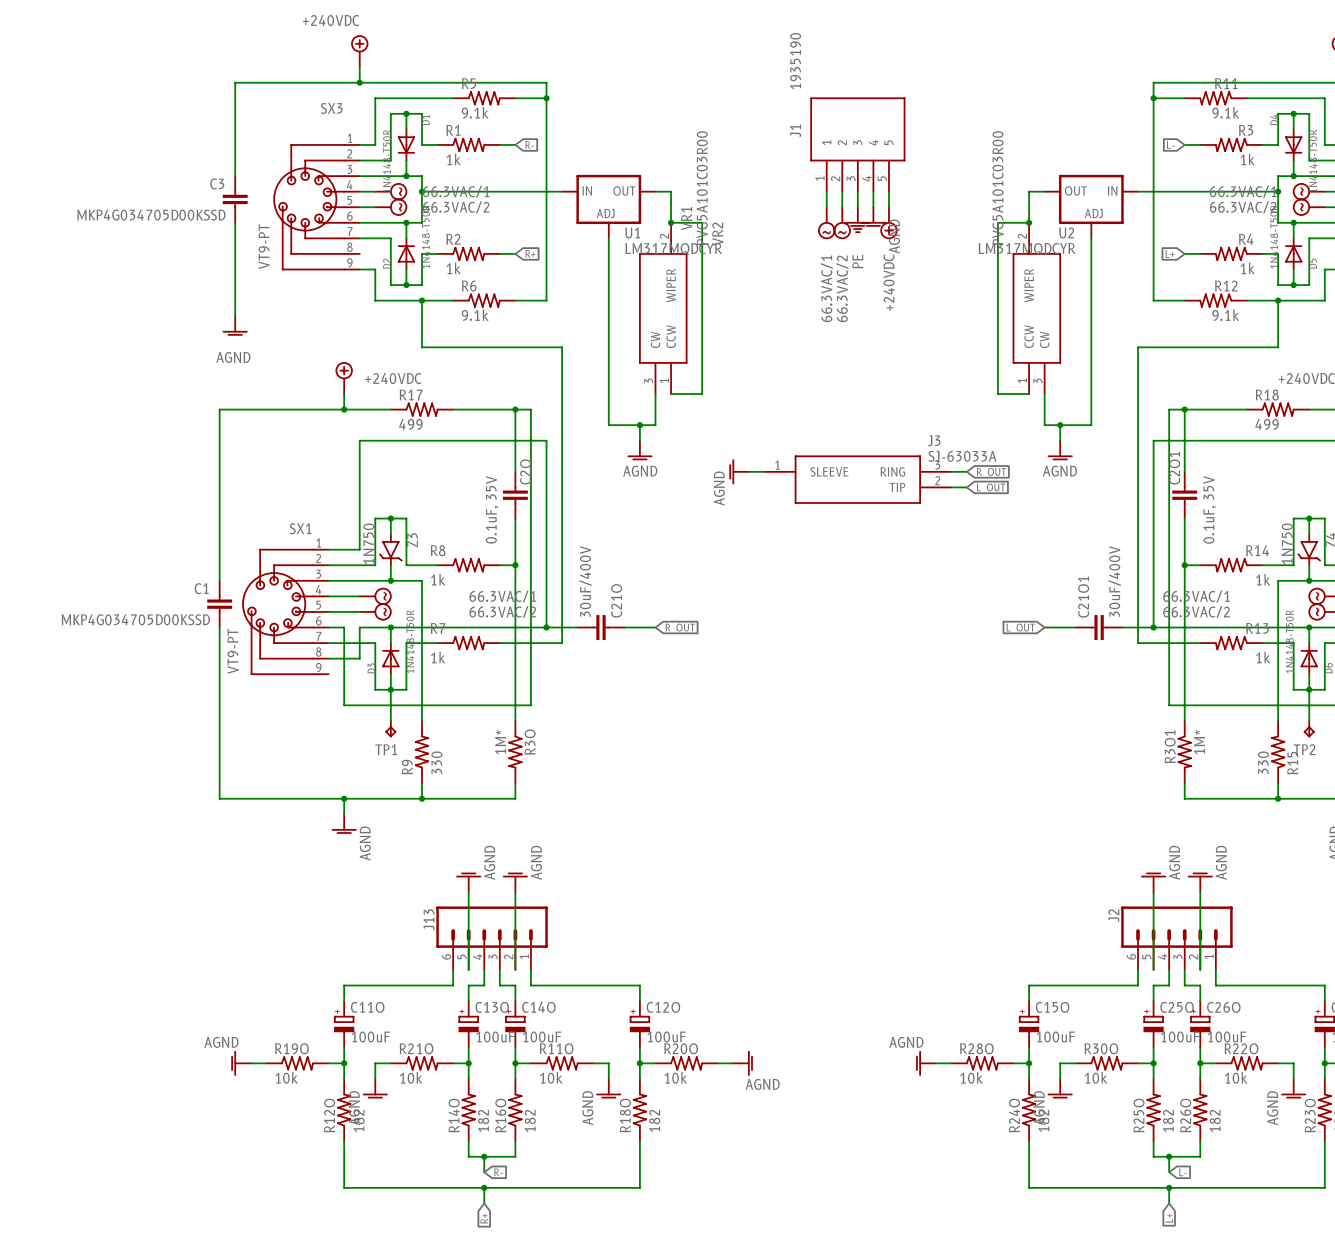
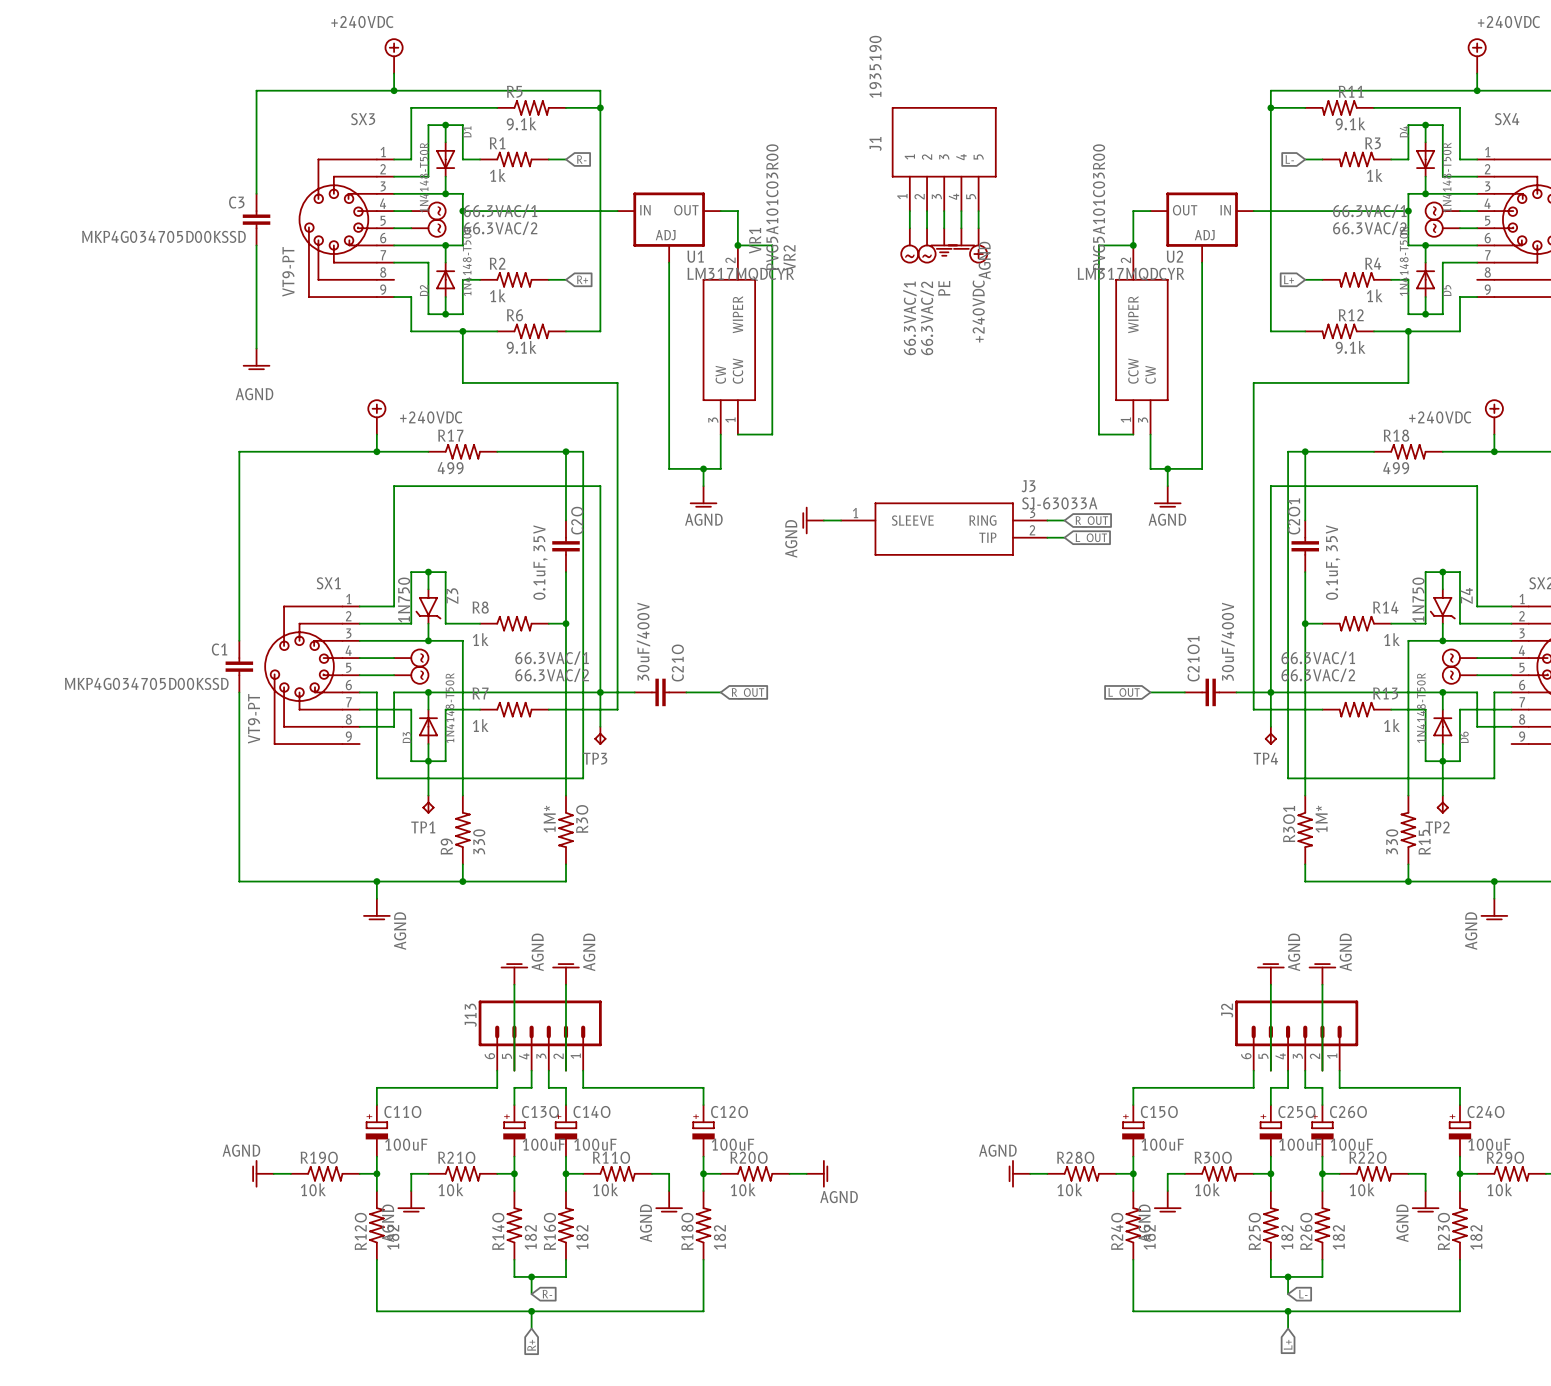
wire: none -> (600, 692) (600, 726)
wire: none -> (1270, 692) (1270, 726)
TP3: none -> (600, 735)
TP4: none -> (1270, 735)

